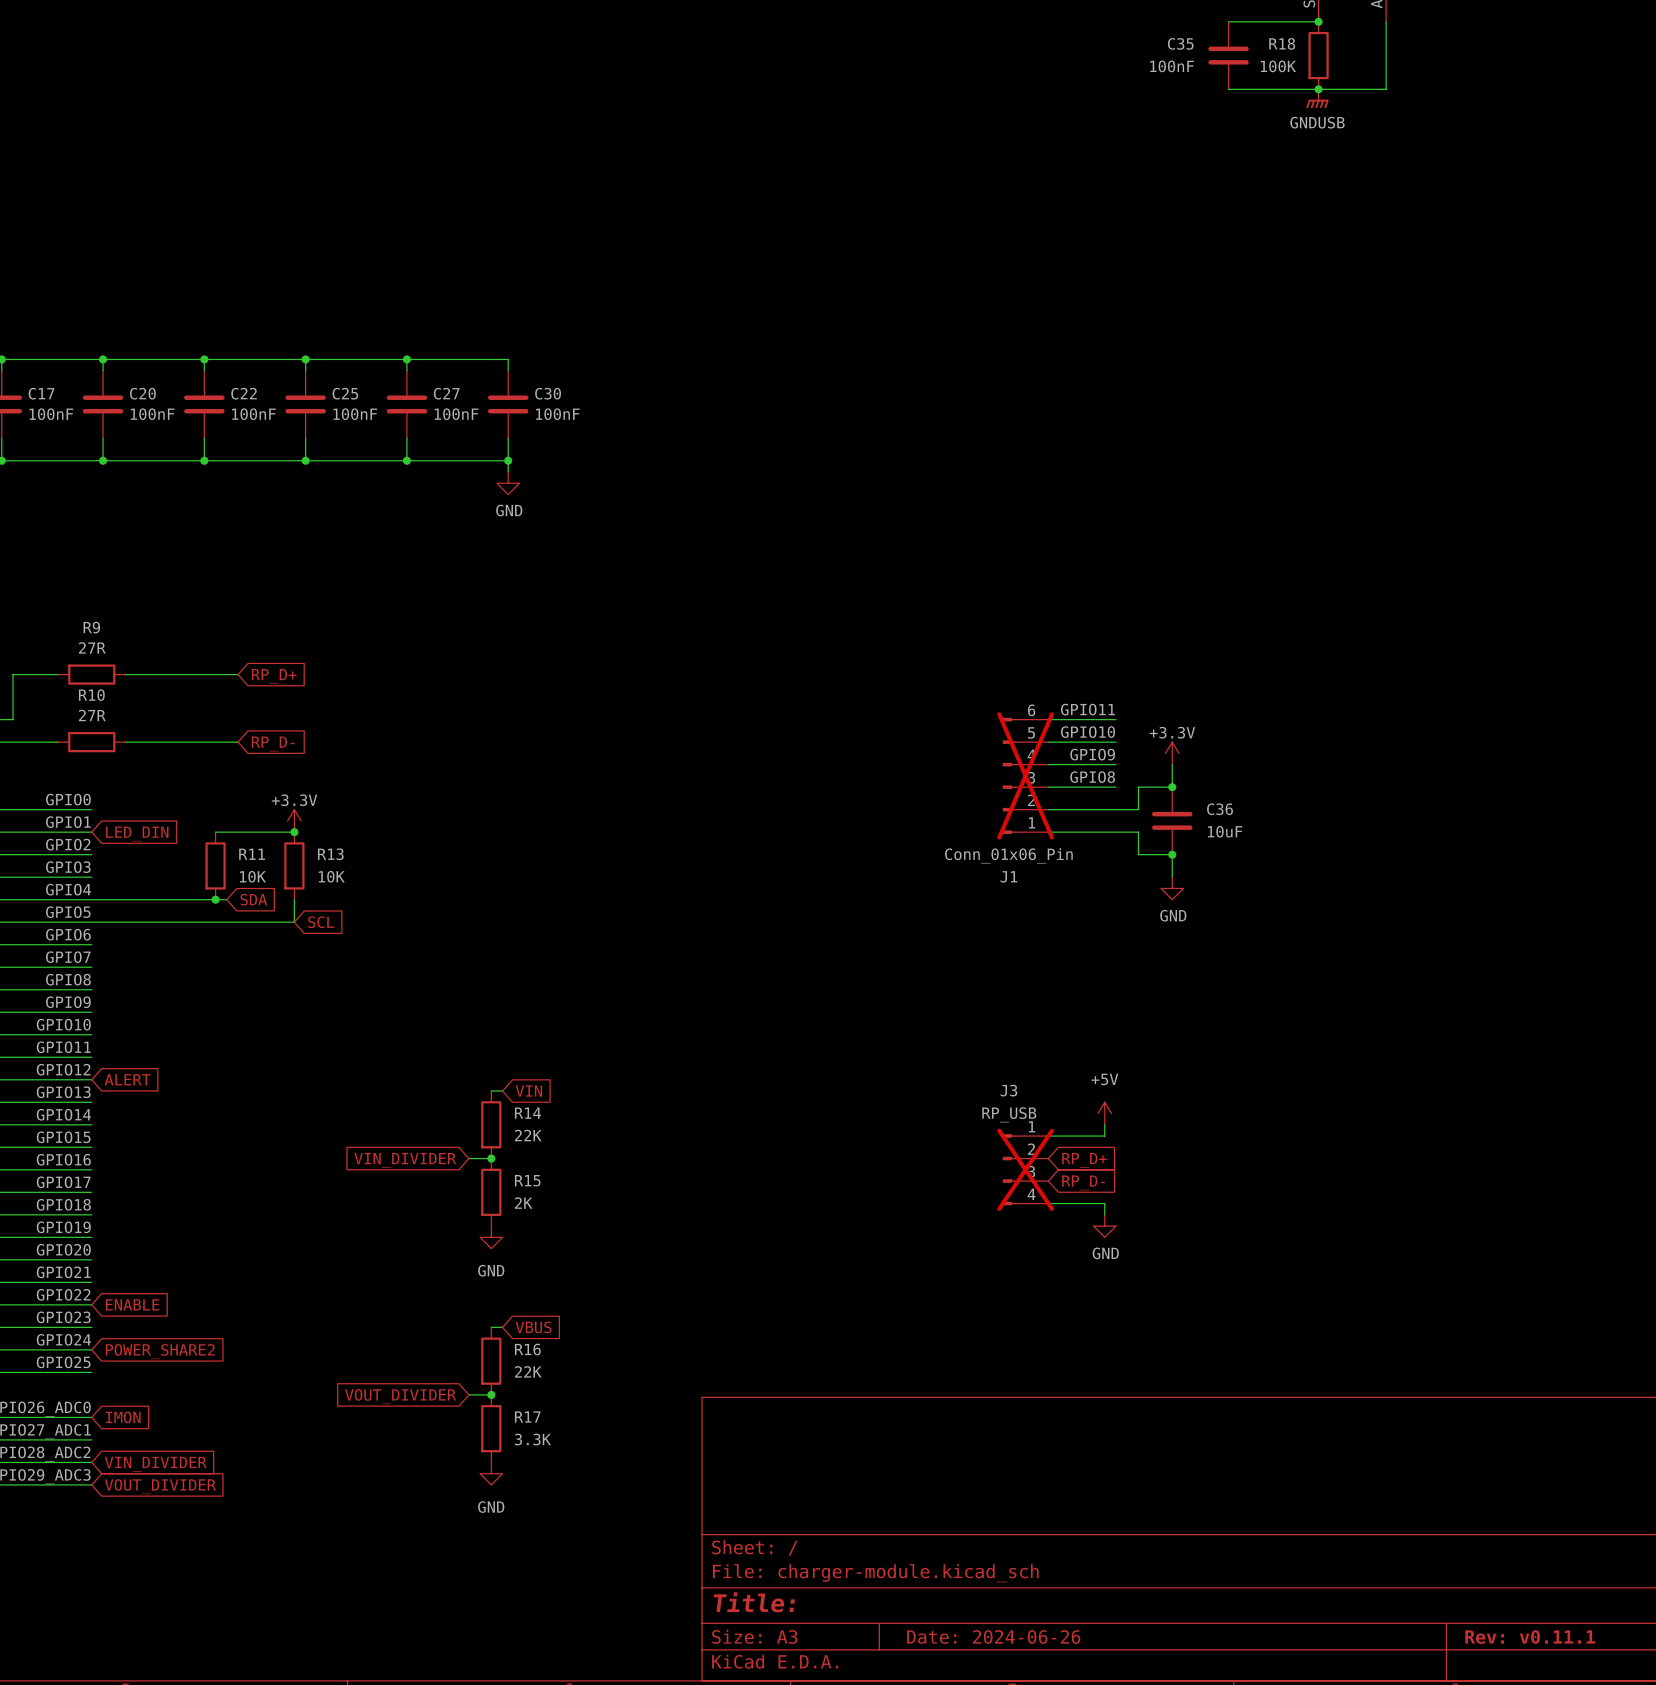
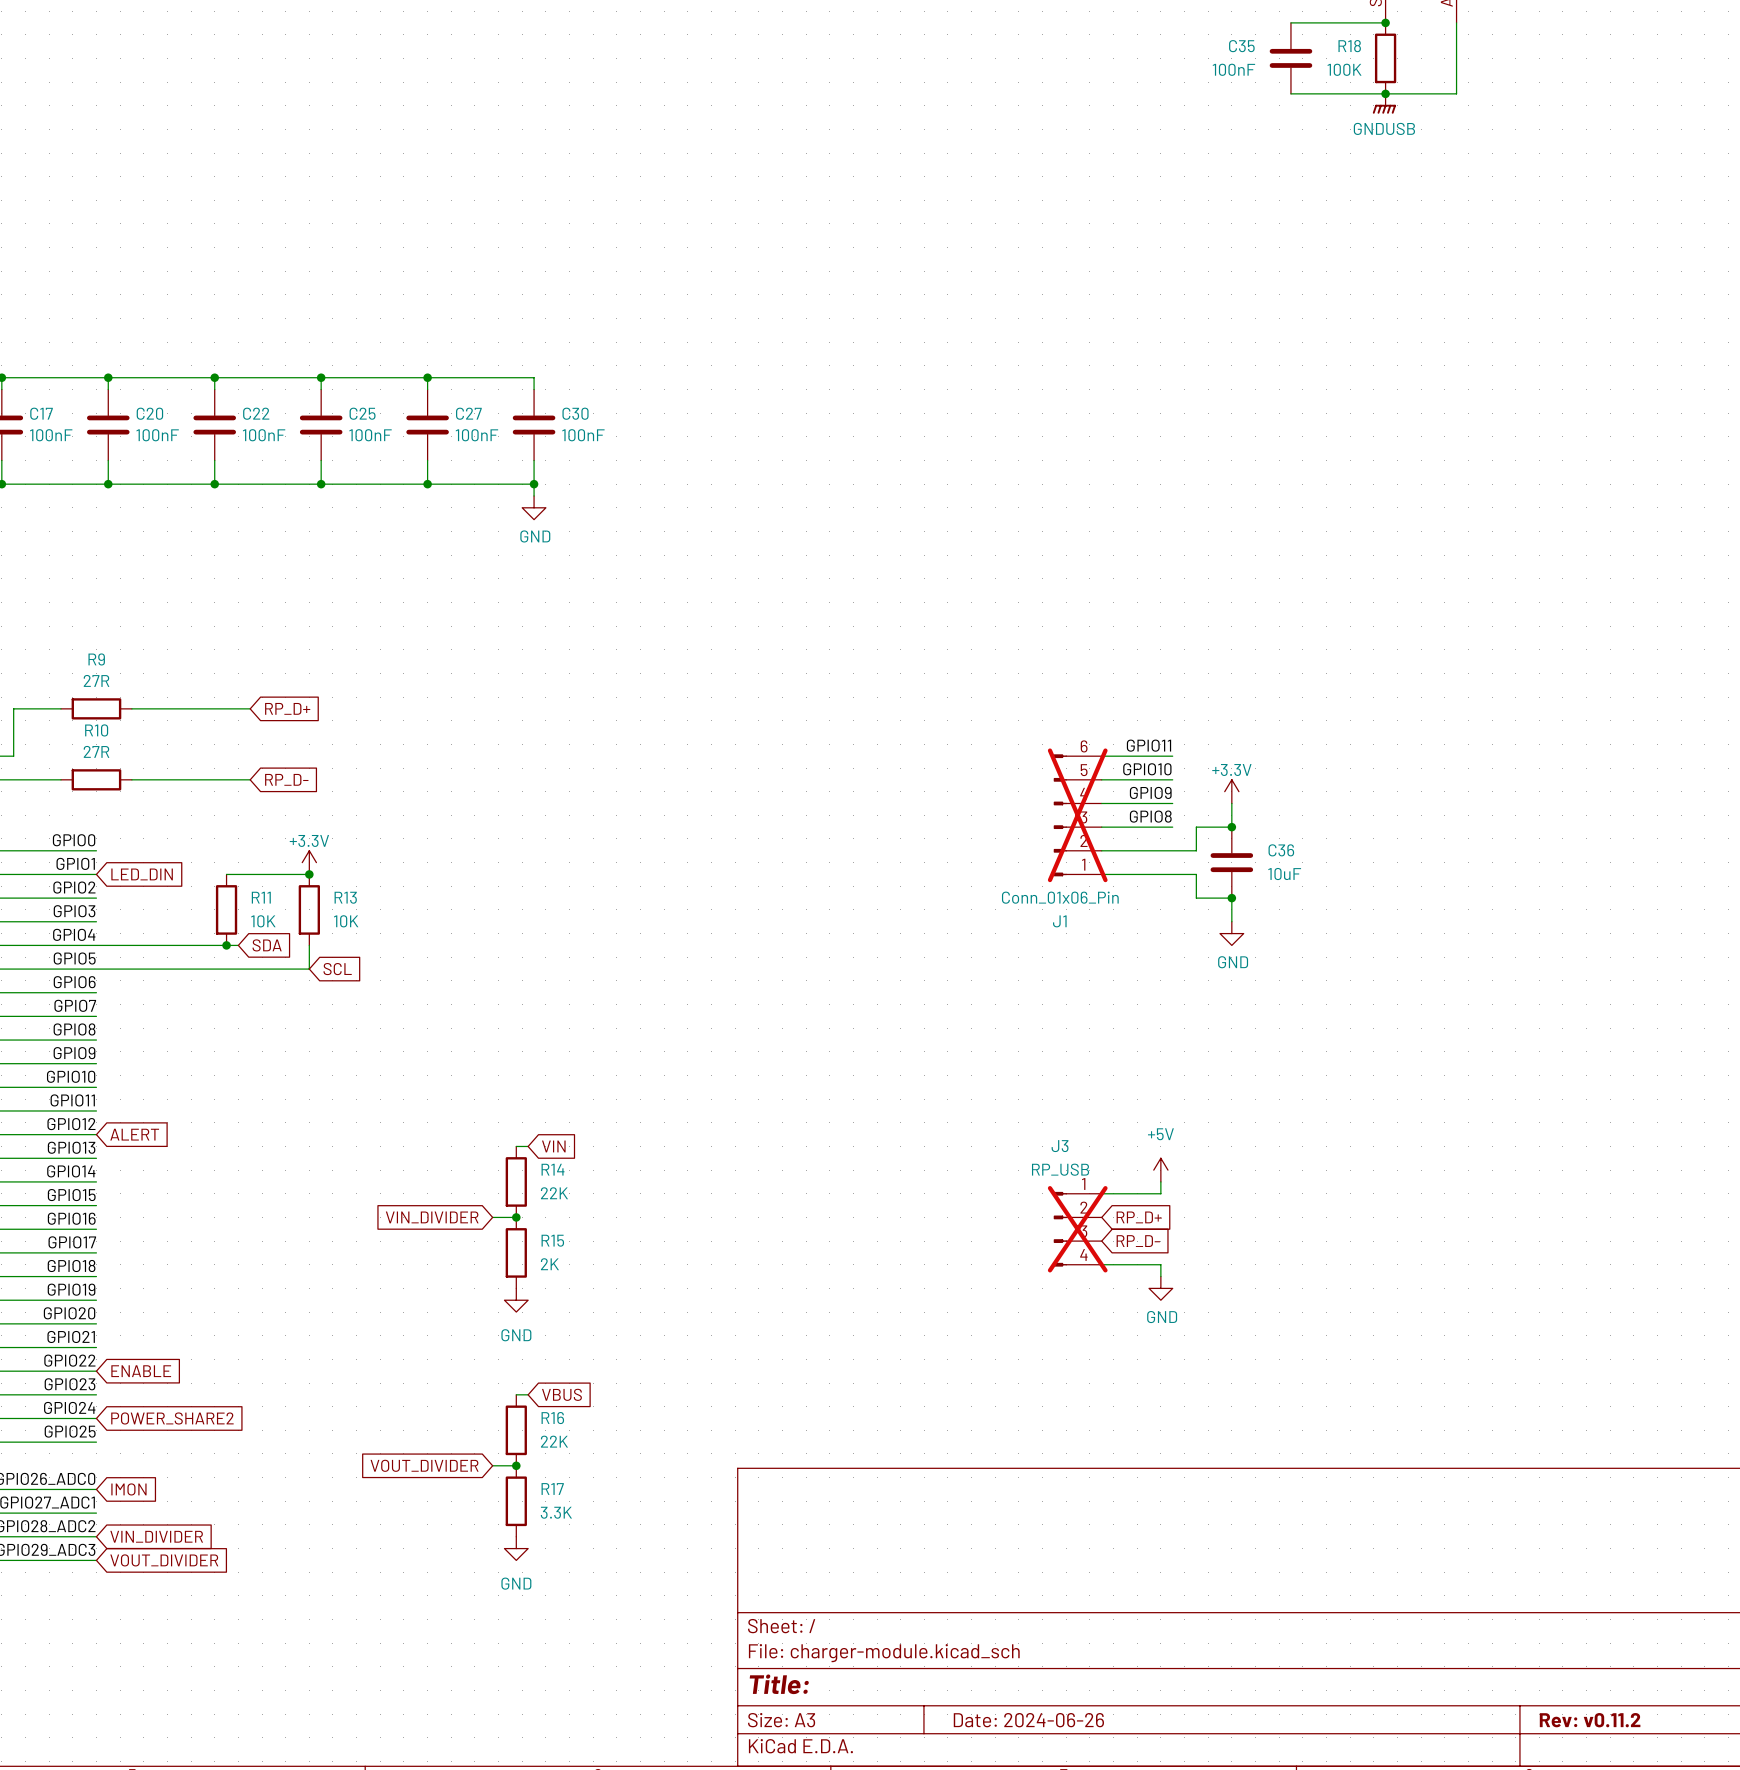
title block: Rev: v0.11.1 (1530, 1636) -> Rev: v0.11.2 (1590, 1720)

